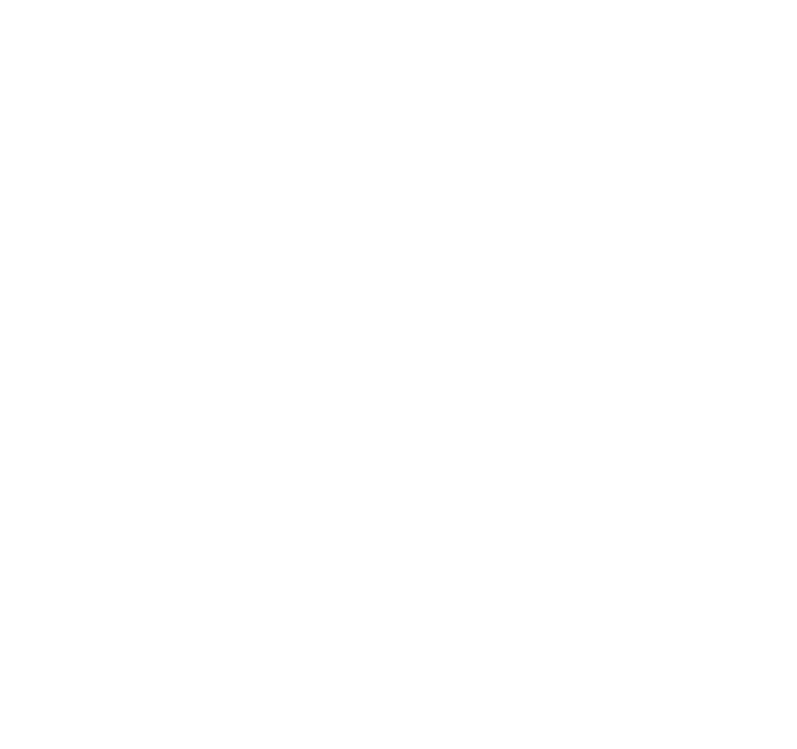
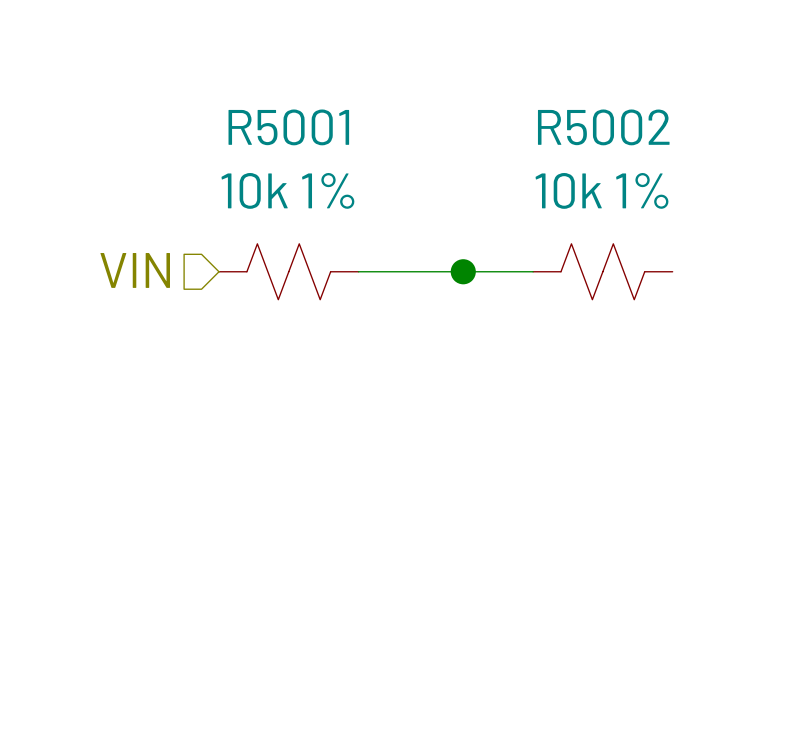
hierarchical label: none -> VIN (135, 270)
R5001: none -> 10k 1% (288, 271)
wire: none -> (358, 271) (533, 271)
junction: none -> (463, 271)
R5002: none -> 10k 1% (602, 271)

